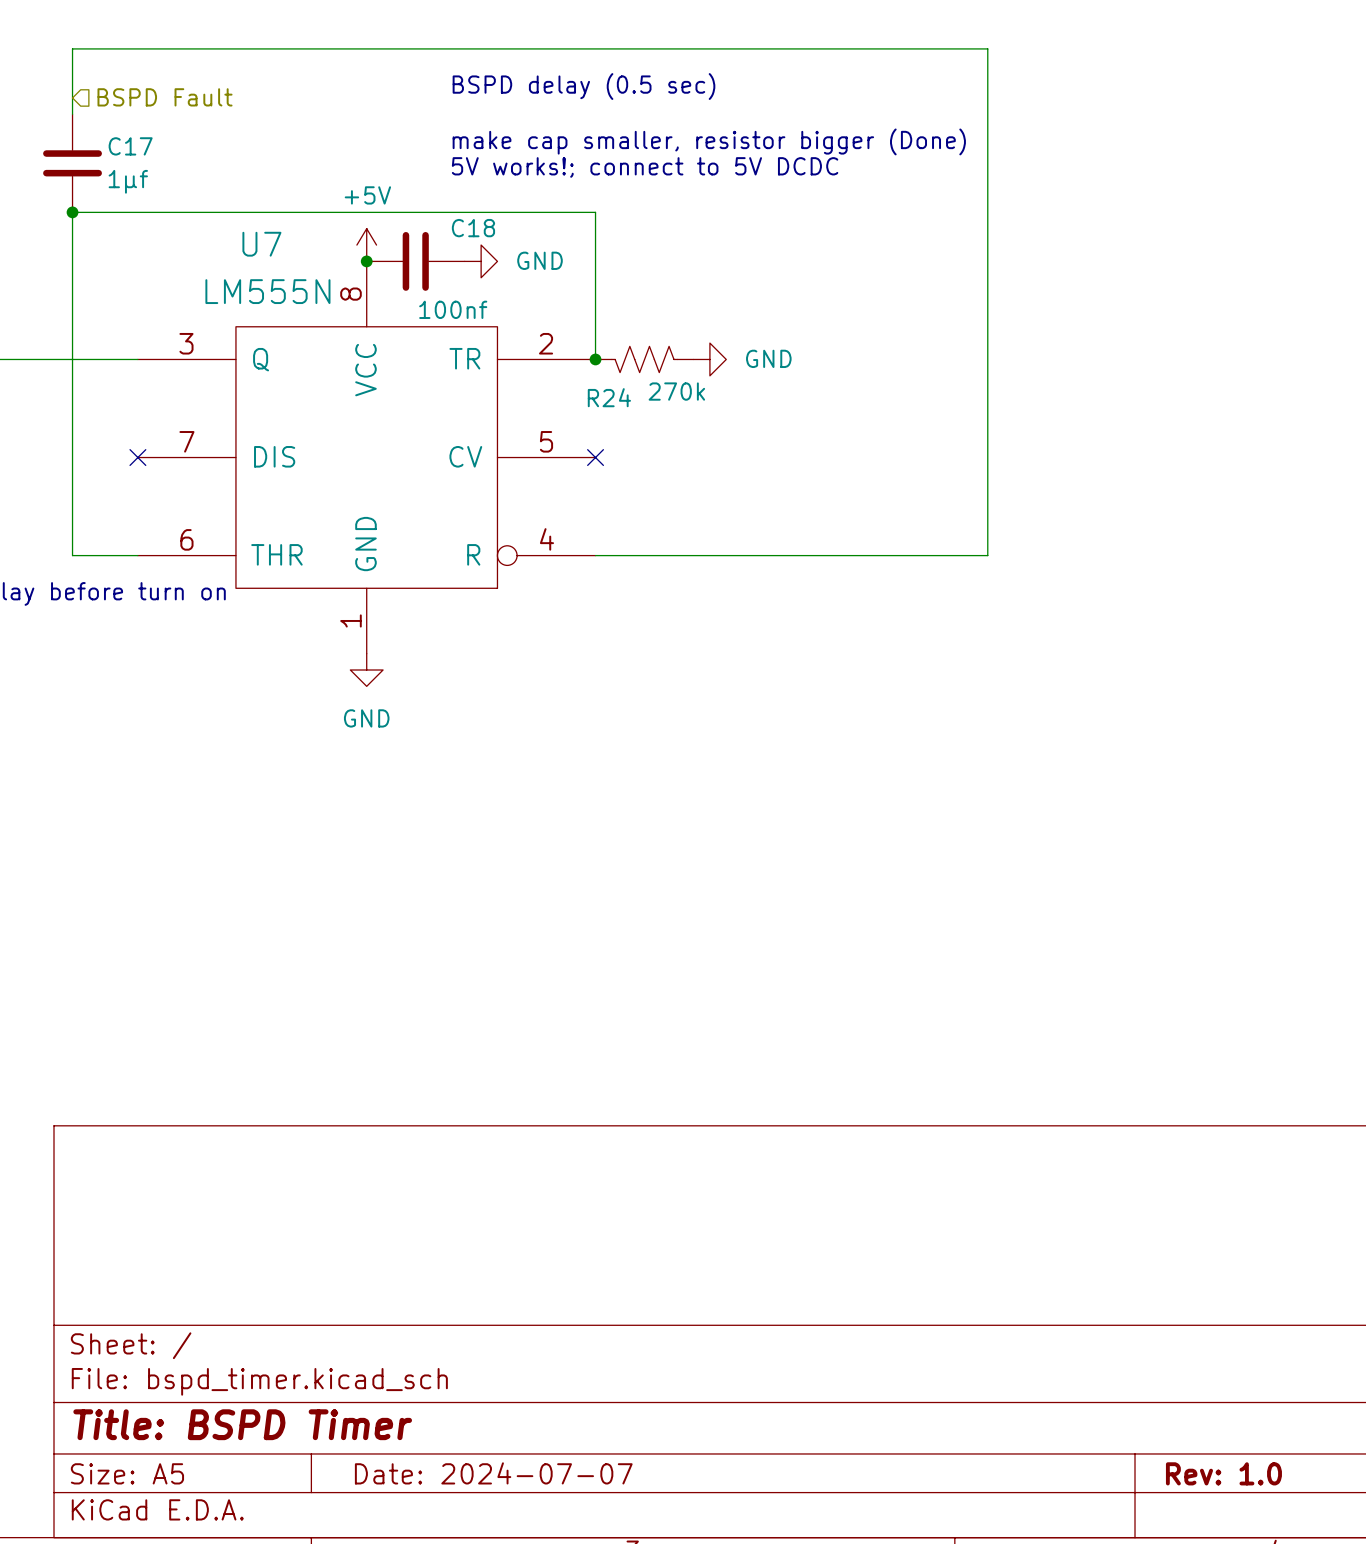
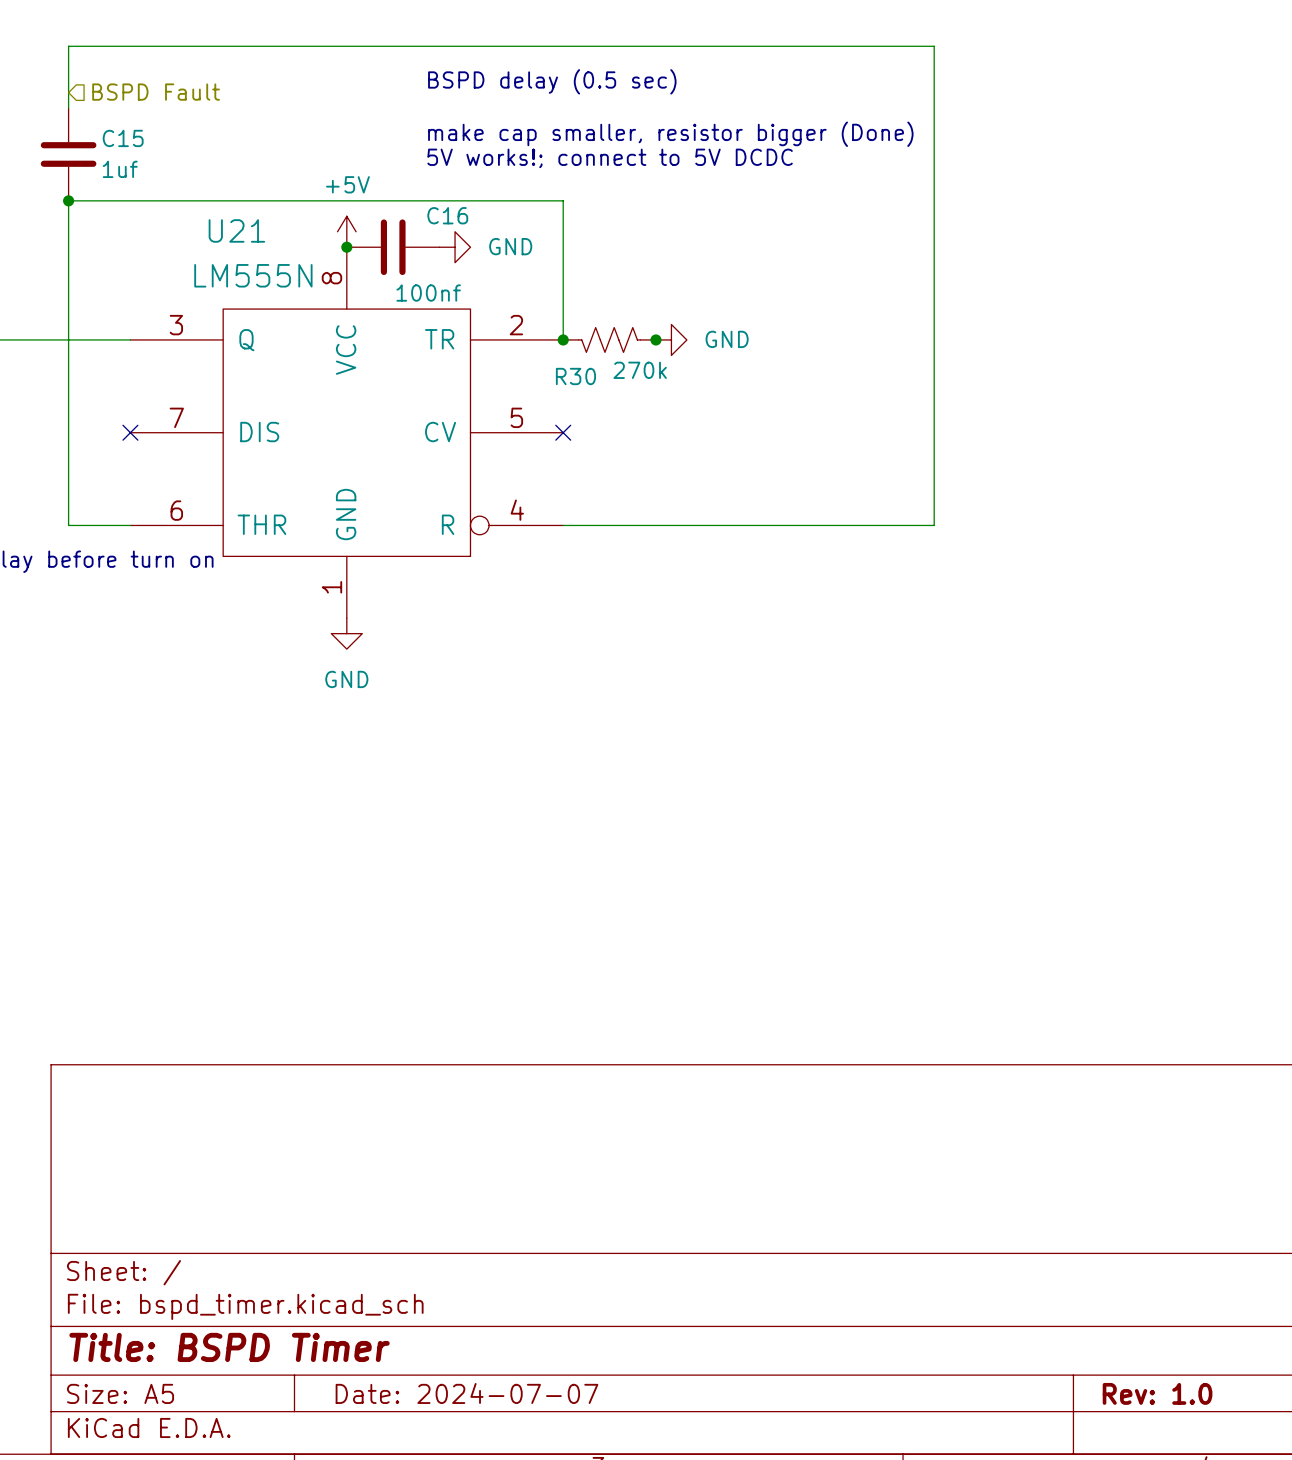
C17 name: C17 (130, 146) -> C15 (123, 138)
C17 value: 1μf (128, 181) -> 1uf (120, 169)
C18 name: C18 (473, 228) -> C16 (447, 215)
U7 name: U7 (261, 244) -> U21 (236, 230)
junction: none -> (655, 339)
R24 name: R24 (609, 397) -> R30 (575, 376)

